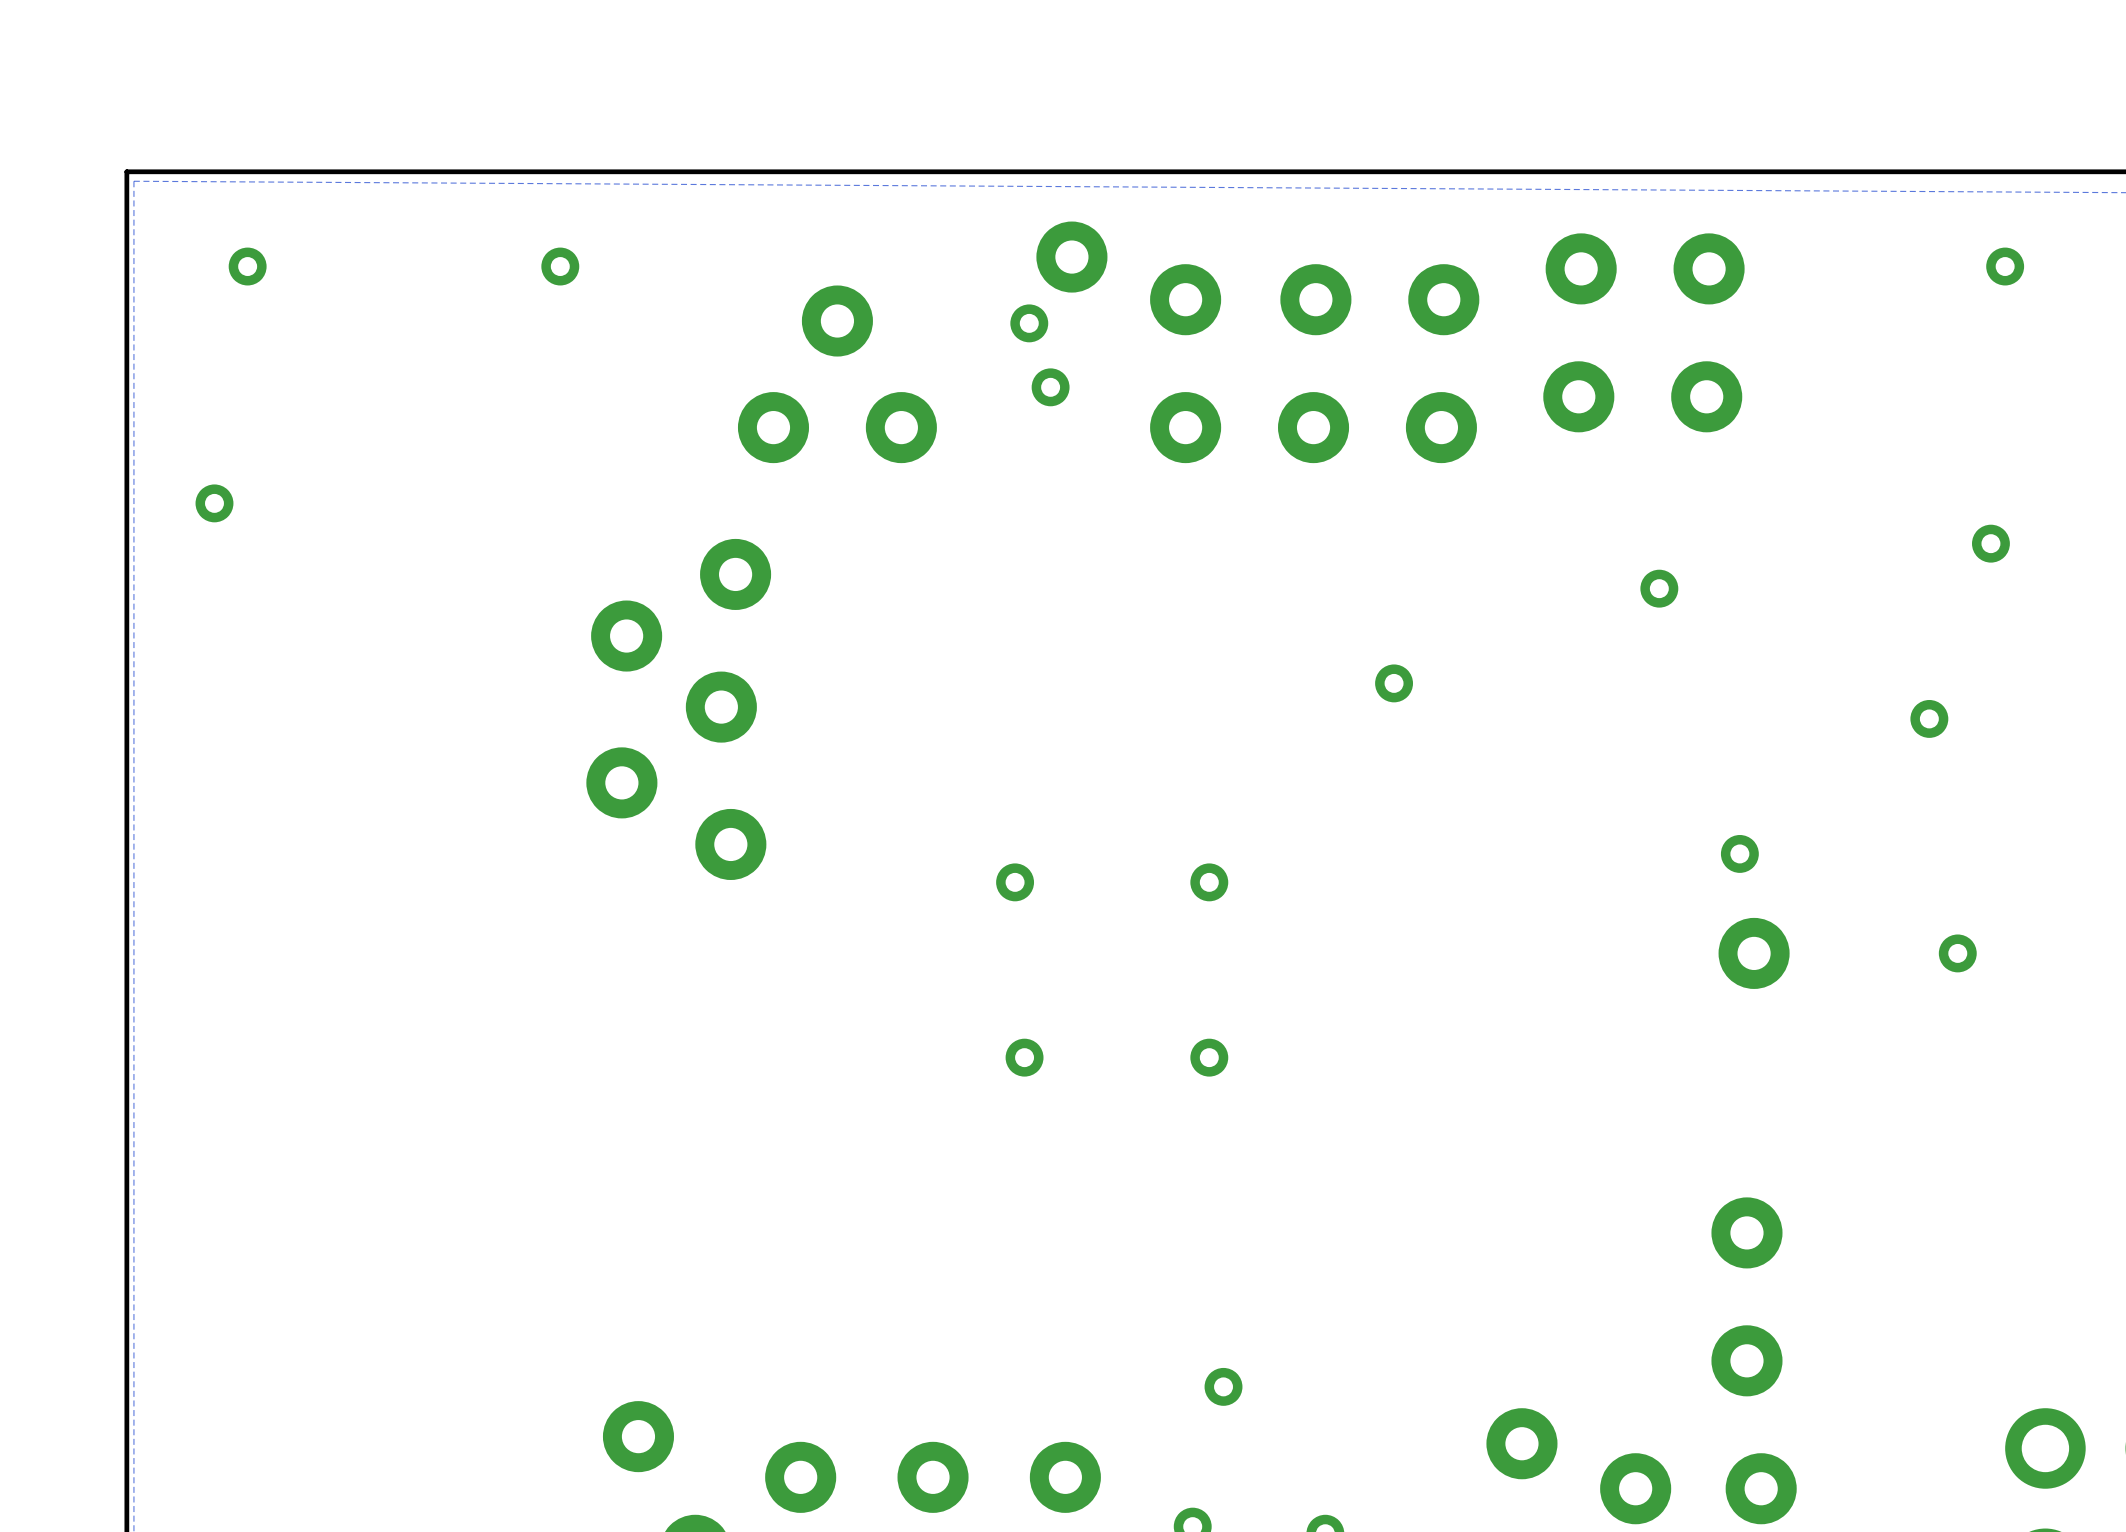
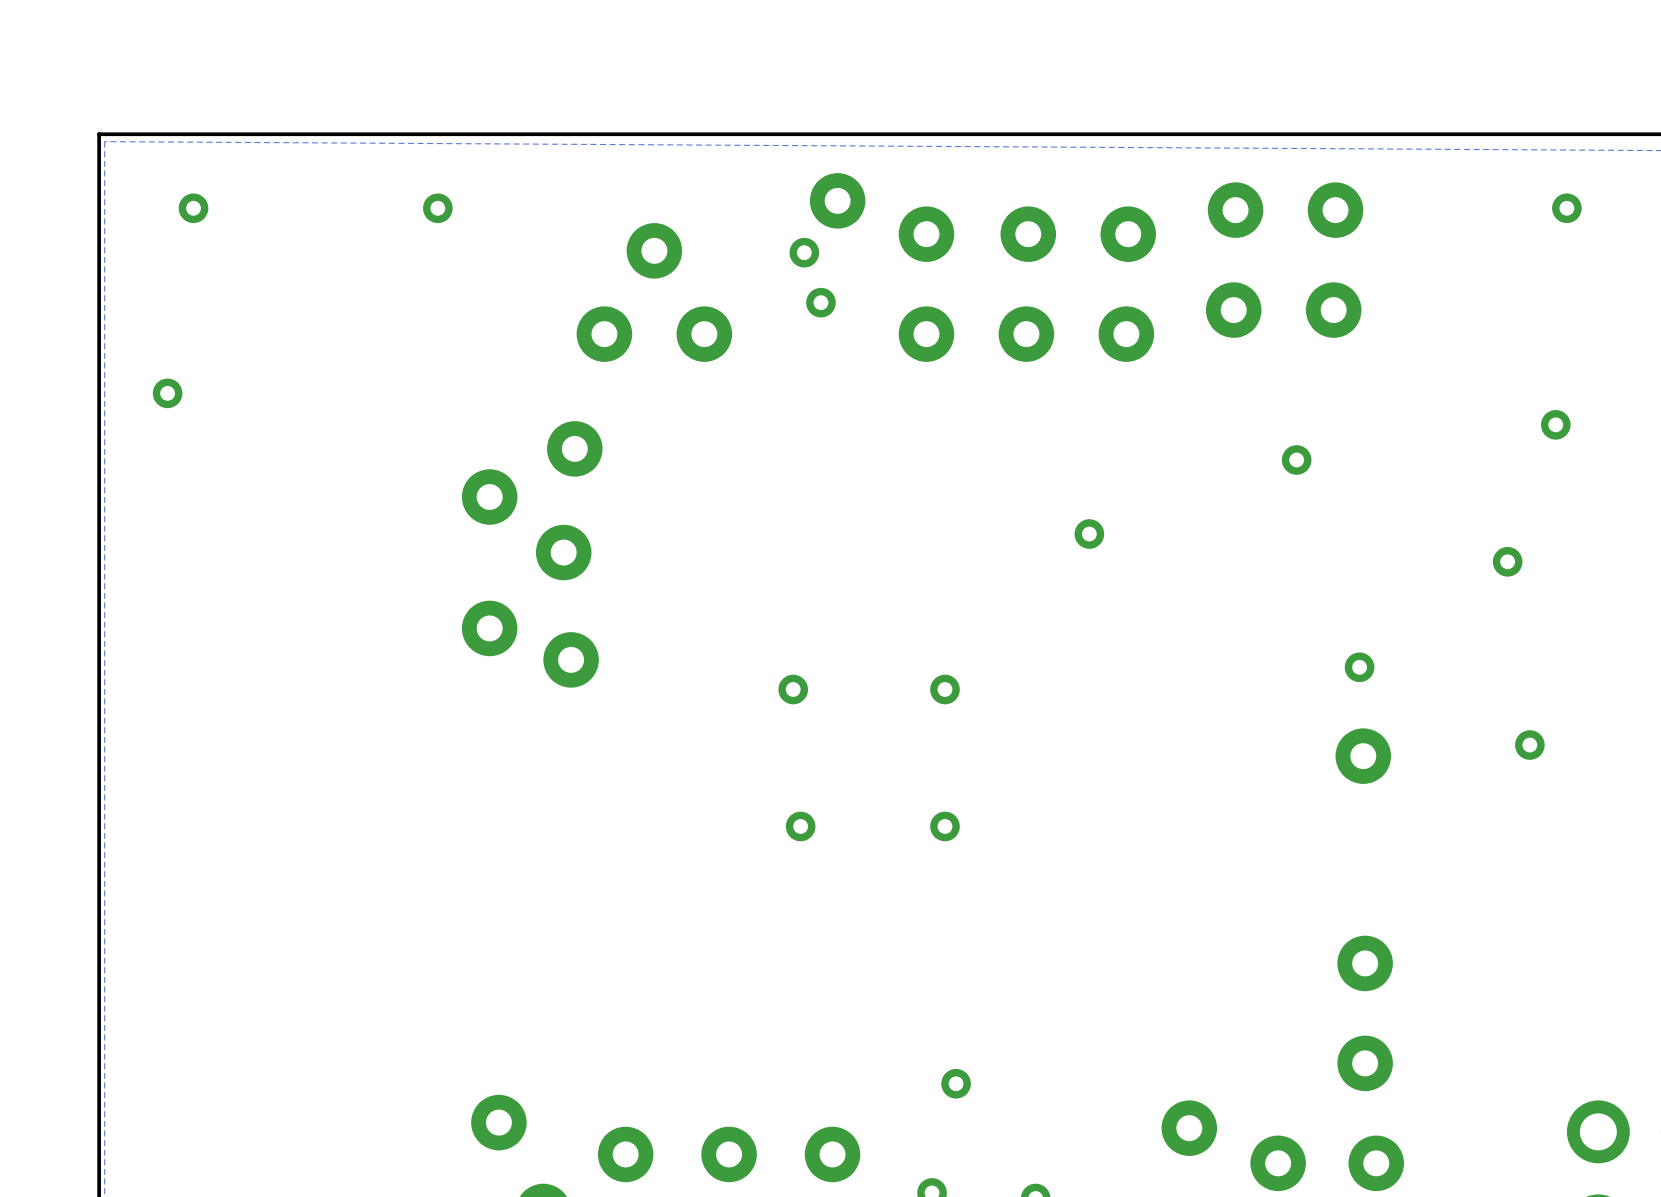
part position: (621, 782) -> (489, 628)
part position: (1754, 953) -> (1363, 756)

